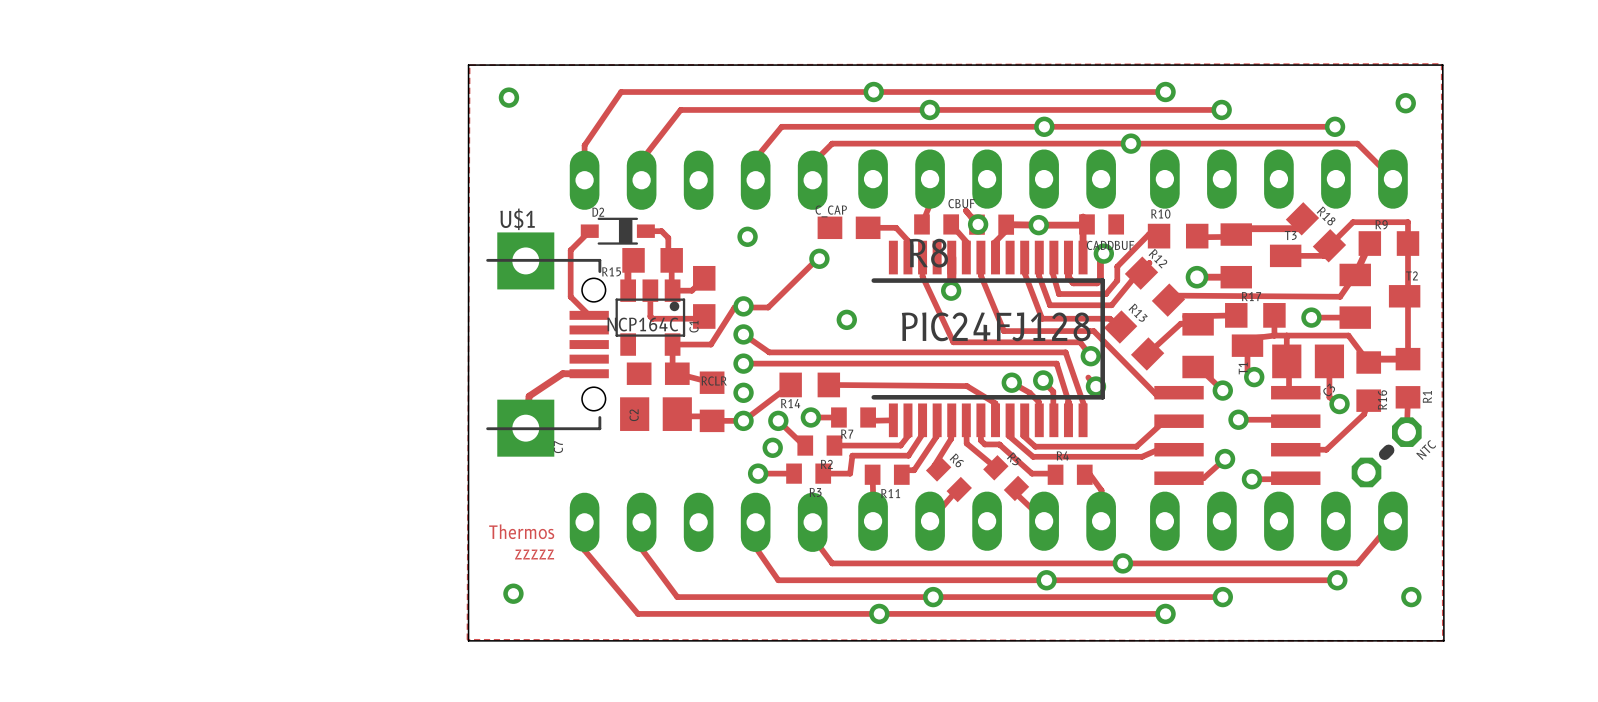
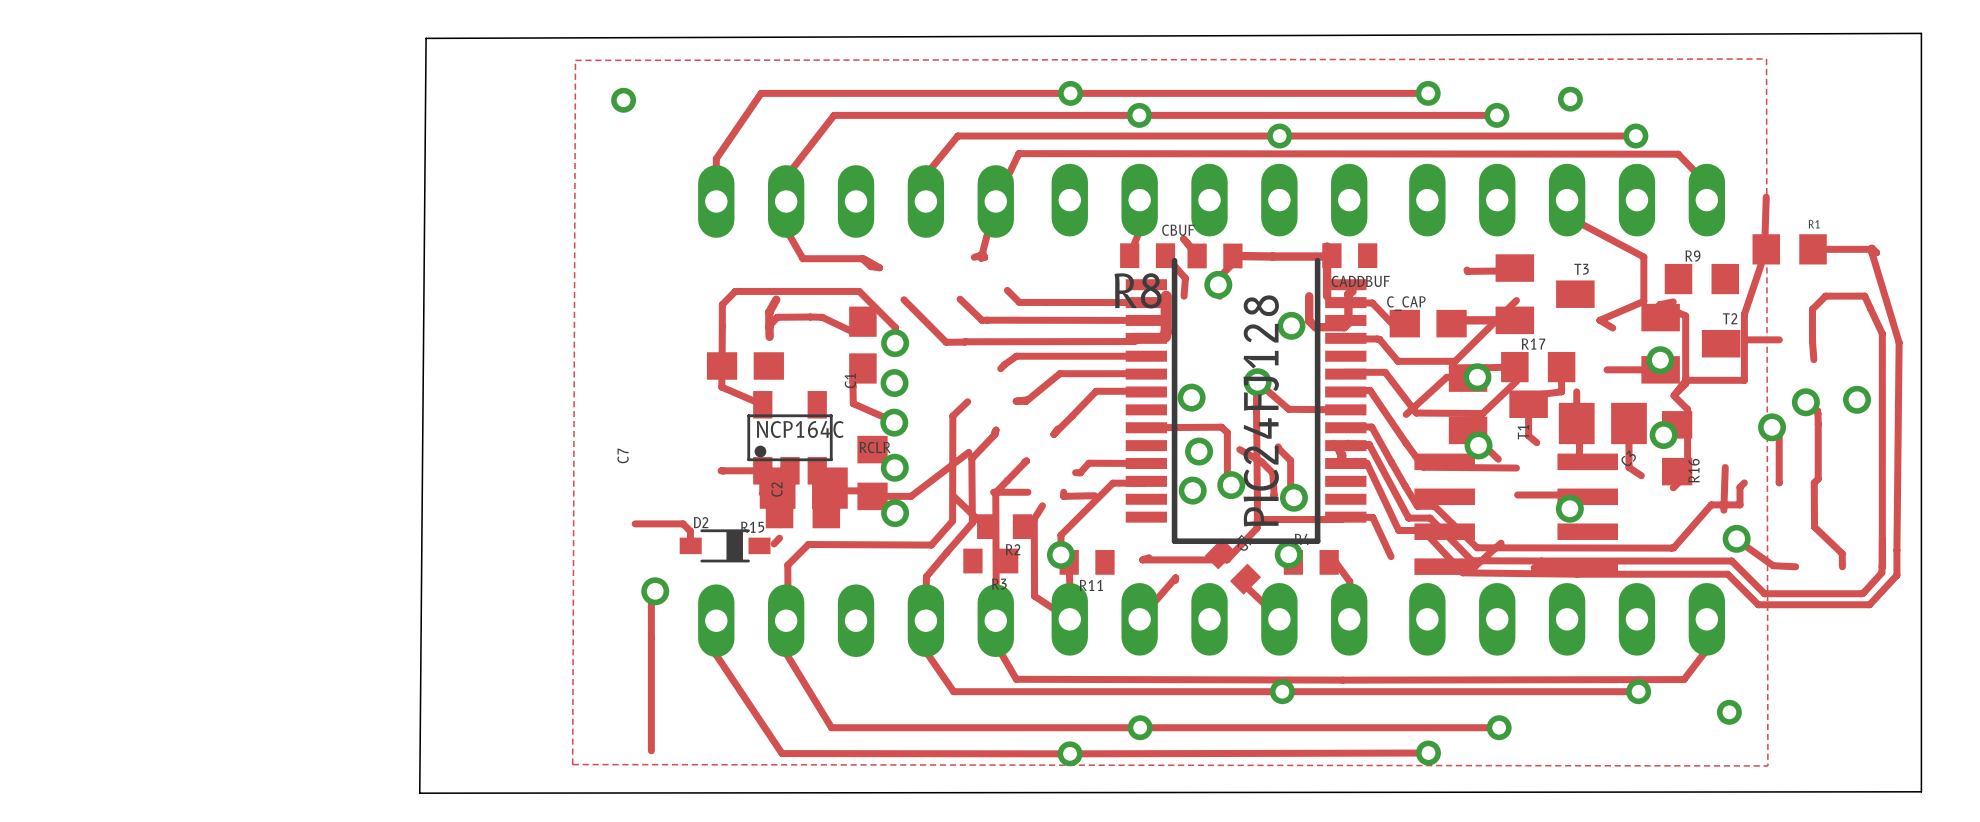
board edge: (468, 65) (468, 640) (1443, 640) (1442, 65) (468, 65) -> (1921, 33) (426, 38) (419, 793) (1921, 791) (1921, 33)
via: none -> (1570, 99)
via: (1405, 103) -> none
via: (1130, 143) -> none
track: none -> (1766, 197) (1764, 258) (1766, 249) (1744, 314) (1744, 380) (1685, 380) (1674, 395) (1685, 383) (1685, 315) (1659, 304) (1673, 301)
track: none -> (1567, 200) (1571, 204) (1571, 218) (1643, 257) (1643, 301) (1599, 320) (1612, 328)
track: (1392, 179) (1357, 143) (832, 143) (812, 163) (812, 180) -> (1706, 200) (1706, 183) (1678, 154) (1018, 153) (995, 201) (981, 258) (984, 257)
track: none -> (786, 201) (785, 227) (802, 258) (862, 258) (870, 266) (879, 267) (863, 258)
track: (1302, 218) (1297, 228) (1245, 228) (1236, 234) (1249, 227) -> none
track: none -> (1871, 248) (1813, 249)
track: none -> (1872, 248) (1876, 252) (1871, 252) (1899, 342) (1896, 575) (1869, 604) (1758, 604) (1727, 574) (1462, 572) (1423, 530) (1398, 530) (1366, 463) (1342, 462) (1345, 463)
via: (978, 224) -> none
track: none -> (974, 257) (980, 255) (984, 257)
via: (1038, 225) -> none
C_CAP position: (849, 227) -> (1428, 323)
track: (868, 227) (896, 227) (908, 241) (907, 257) -> none
track: (589, 231) (570, 250) (570, 296) (589, 315) -> none
D2 position: (617, 231) -> (725, 545)
track: (645, 231) (661, 231) (668, 237) (668, 257) (671, 260) (672, 290) (691, 290) (704, 278) -> none
R18: (1315, 232) -> none
via: (747, 236) -> none
track: (1159, 236) (1149, 234) (1117, 266) (1117, 280) (1106, 294) (1058, 294) (1052, 273) (1053, 257) -> none
R10: (1178, 236) -> none
track: (1369, 243) (1355, 274) (1340, 296) (1175, 295) (1168, 300) -> none
via: none -> (1218, 284)
track: none -> (1007, 290) (1019, 302) (1146, 302)
via: (1103, 253) -> none
track: (1285, 255) (1323, 255) (1329, 245) (1353, 222) (1407, 222) (1407, 359) (1377, 359) (1368, 362) (1348, 335) (1274, 335) -> none
track: (922, 257) (922, 276) (953, 342) (1080, 342) (1090, 356) -> none
track: (980, 257) (980, 275) (1003, 331) (1093, 331) (1156, 395) (1179, 392) -> none
track: (1024, 257) (1024, 273) (1042, 318) (1109, 318) (1120, 327) -> none
track: (1039, 257) (1038, 274) (1049, 305) (1111, 305) (1141, 268) (1139, 269) (1149, 263) (1141, 273) -> none
track: (819, 258) (768, 307) (734, 307) (710, 344) (672, 344) (672, 368) (677, 373) (712, 382) -> none
via: (819, 258) -> none
track: none -> (960, 299) (982, 320) (1146, 320)
R15 position: (652, 260) -> (802, 513)
track: none -> (903, 299) (946, 342) (1134, 341) (1146, 338)
track: none -> (1516, 300) (1455, 361) (1397, 361) (1379, 339) (1342, 338) (1345, 338)
track: none -> (1345, 302) (1341, 303) (1372, 303) (1394, 326) (1404, 323)
via: (1196, 277) -> none
via: none -> (1291, 325)
track: none -> (769, 326) (777, 317) (822, 317) (853, 332)
R12: (1155, 286) -> none
track: (650, 290) (650, 316) (652, 318) (702, 318) (704, 316) -> none
via: (951, 290) -> none
track: none -> (1744, 339) (1779, 339)
track: none -> (895, 343) (895, 327) (859, 291) (735, 291) (722, 304) (721, 387) (762, 404)
via position: (743, 306) -> (895, 343)
track: none -> (1146, 356) (1016, 356) (1000, 368)
via: none -> (1660, 360)
track: none -> (1813, 359) (1812, 309) (1825, 296) (1864, 296) (1882, 333) (1882, 567)
part: (650, 317) -> none
via: (1311, 317) -> none
via: (846, 319) -> none
track: none -> (1146, 374) (1059, 373) (1026, 401) (1016, 401) (1027, 399)
track: none -> (1345, 374) (1344, 372) (1385, 372) (1416, 413) (1482, 413) (1516, 381)
via: none -> (1477, 377)
track: none -> (853, 378) (853, 403) (897, 422) (894, 422) (896, 421)
via: none -> (1257, 382)
track: (743, 334) (769, 352) (1065, 352) (1083, 404) (1082, 419) -> none
via position: (743, 334) -> (894, 383)
track: none -> (1141, 392) (1146, 391) (1096, 391) (1053, 434) (1057, 428)
track: none -> (1345, 391) (1342, 391) (1370, 390) (1423, 467) (1516, 468)
part: (988, 338) -> none
track: none -> (1674, 395) (1687, 409) (1687, 473) (1673, 487)
via: none -> (1191, 397)
R13: (1134, 340) -> none
part: none -> (1246, 400)
via: none -> (1857, 399)
track: none -> (967, 401) (952, 416) (952, 521) (931, 545) (808, 544) (787, 565) (788, 618) (786, 620)
U$1: (547, 344) -> none
via: none -> (1805, 402)
track: none -> (1345, 409) (1288, 409) (1256, 382) (1257, 519)
track: none -> (1816, 410) (1805, 402) (1817, 410) (1817, 413) (1818, 478) (1814, 482) (1814, 527) (1842, 553) (1842, 566)
via: (1090, 356) -> none
track: (743, 363) (1056, 363) (1069, 402) (1069, 424) -> none
via position: (743, 363) -> (894, 422)
track: none -> (1146, 427) (1221, 427) (1227, 432) (1227, 484) (1231, 485)
track: none -> (1345, 427) (1371, 427) (1417, 506) (1434, 506) (1477, 547) (1673, 547) (1711, 504) (1739, 504) (1739, 487) (1744, 482)
track: none -> (1772, 427) (1779, 434) (1779, 482)
via: none -> (1772, 427)
track: none -> (994, 432) (996, 430) (994, 434) (971, 458) (972, 523) (926, 576) (925, 620)
via: none -> (1663, 435)
track: (589, 373) (562, 373) (529, 396) (525, 428) -> none
part: none -> (790, 437)
C7 position: (658, 373) -> (745, 365)
via: (1254, 377) -> none
track: none -> (1369, 444) (1408, 518) (1430, 518) (1471, 560) (1731, 561) (1764, 593) (1861, 593) (1881, 572) (1882, 567)
R1 rotation: 0° (1407, 378) -> 90° clockwise (1789, 249)
R1 position: (1407, 378) -> (1789, 249)
via: (1043, 380) -> none
via: (1011, 382) -> none
R14: (809, 384) -> none
track: (828, 384) (966, 386) (995, 403) (995, 420) -> none
via: none -> (1199, 451)
via: (1095, 386) -> none
via position: (1222, 390) -> (1478, 445)
via position: (743, 392) -> (894, 467)
track: none -> (1146, 463) (1088, 463) (1080, 472) (1075, 472)
track: none -> (723, 471) (721, 470) (762, 470) (762, 493) (769, 500)
track: (1368, 400) (1364, 414) (1326, 449) (1295, 449) -> none
via: (1339, 404) -> none
track: none -> (1146, 481) (1144, 483) (1112, 483) (1060, 535) (1060, 554)
via: none -> (1231, 485)
via: none -> (1192, 490)
via: (810, 417) -> none
R7: (853, 417) -> none
via: (1238, 419) -> none
via position: (743, 420) -> (895, 513)
via: (778, 420) -> none
track: (907, 420) (908, 435) (900, 445) (834, 445) -> none
track: (922, 420) (923, 433) (908, 455) (852, 455) (850, 473) (822, 473) -> none
track: (937, 420) (936, 436) (914, 470) (898, 470) (901, 474) -> none
track: (951, 420) (951, 438) (934, 465) (938, 468) -> none
track: (966, 420) (966, 443) (995, 467) -> none
track: (980, 420) (980, 440) (984, 444) (999, 444) (1031, 473) (1055, 474) -> none
track: (1010, 420) (1008, 436) (1033, 456) (1141, 456) (1159, 448) (1195, 448) (1179, 449) -> none
track: (1024, 420) (1023, 436) (1035, 446) (1136, 446) (1161, 424) (1196, 424) (1179, 421) -> none
via: none -> (1293, 497)
track: none -> (1042, 505) (1034, 518) (1034, 596) (1069, 619) (1068, 617)
via: none -> (1569, 508)
track: none -> (1345, 517) (1372, 517) (1391, 556)
track: none -> (1345, 517) (1341, 519) (1257, 519)
track: none -> (1257, 519) (1257, 528) (1227, 559) (1142, 559) (1148, 557)
track: none -> (635, 523) (683, 523) (690, 531) (690, 545)
via: (772, 447) -> none
NTC: (1386, 452) -> none
track: none -> (779, 538) (774, 543)
track: none -> (1736, 538) (1773, 565) (1795, 566)
via: none -> (1736, 538)
via: (1225, 459) -> none
via: none -> (1060, 554)
via: none -> (1288, 554)
track: (758, 473) (794, 473) -> none
via: (758, 473) -> none
R6: (948, 479) -> none
via: (1251, 479) -> none
track: none -> (655, 591) (651, 595) (651, 750)
via: none -> (655, 591)
track: (1392, 521) (1357, 563) (832, 563) (812, 537) (812, 522) -> (1706, 619) (1695, 630) (1708, 647) (1684, 679) (1016, 679) (997, 646) (995, 492) (1026, 460) (1024, 462)
text: Thermos (521, 531) -> none
track: (641, 549) (677, 597) (1222, 597) -> (786, 653) (831, 727) (1499, 727)
track: (584, 550) (638, 613) (1165, 613) (1171, 609) -> (716, 655) (782, 753) (1428, 753)
text: zzzzz (534, 554) -> none
via: (1122, 563) -> none
via: (513, 593) -> none
via position: (933, 597) -> (1140, 727)
via position: (1222, 597) -> (1499, 727)
via position: (879, 613) -> (1070, 753)
via position: (1165, 613) -> (1428, 753)

